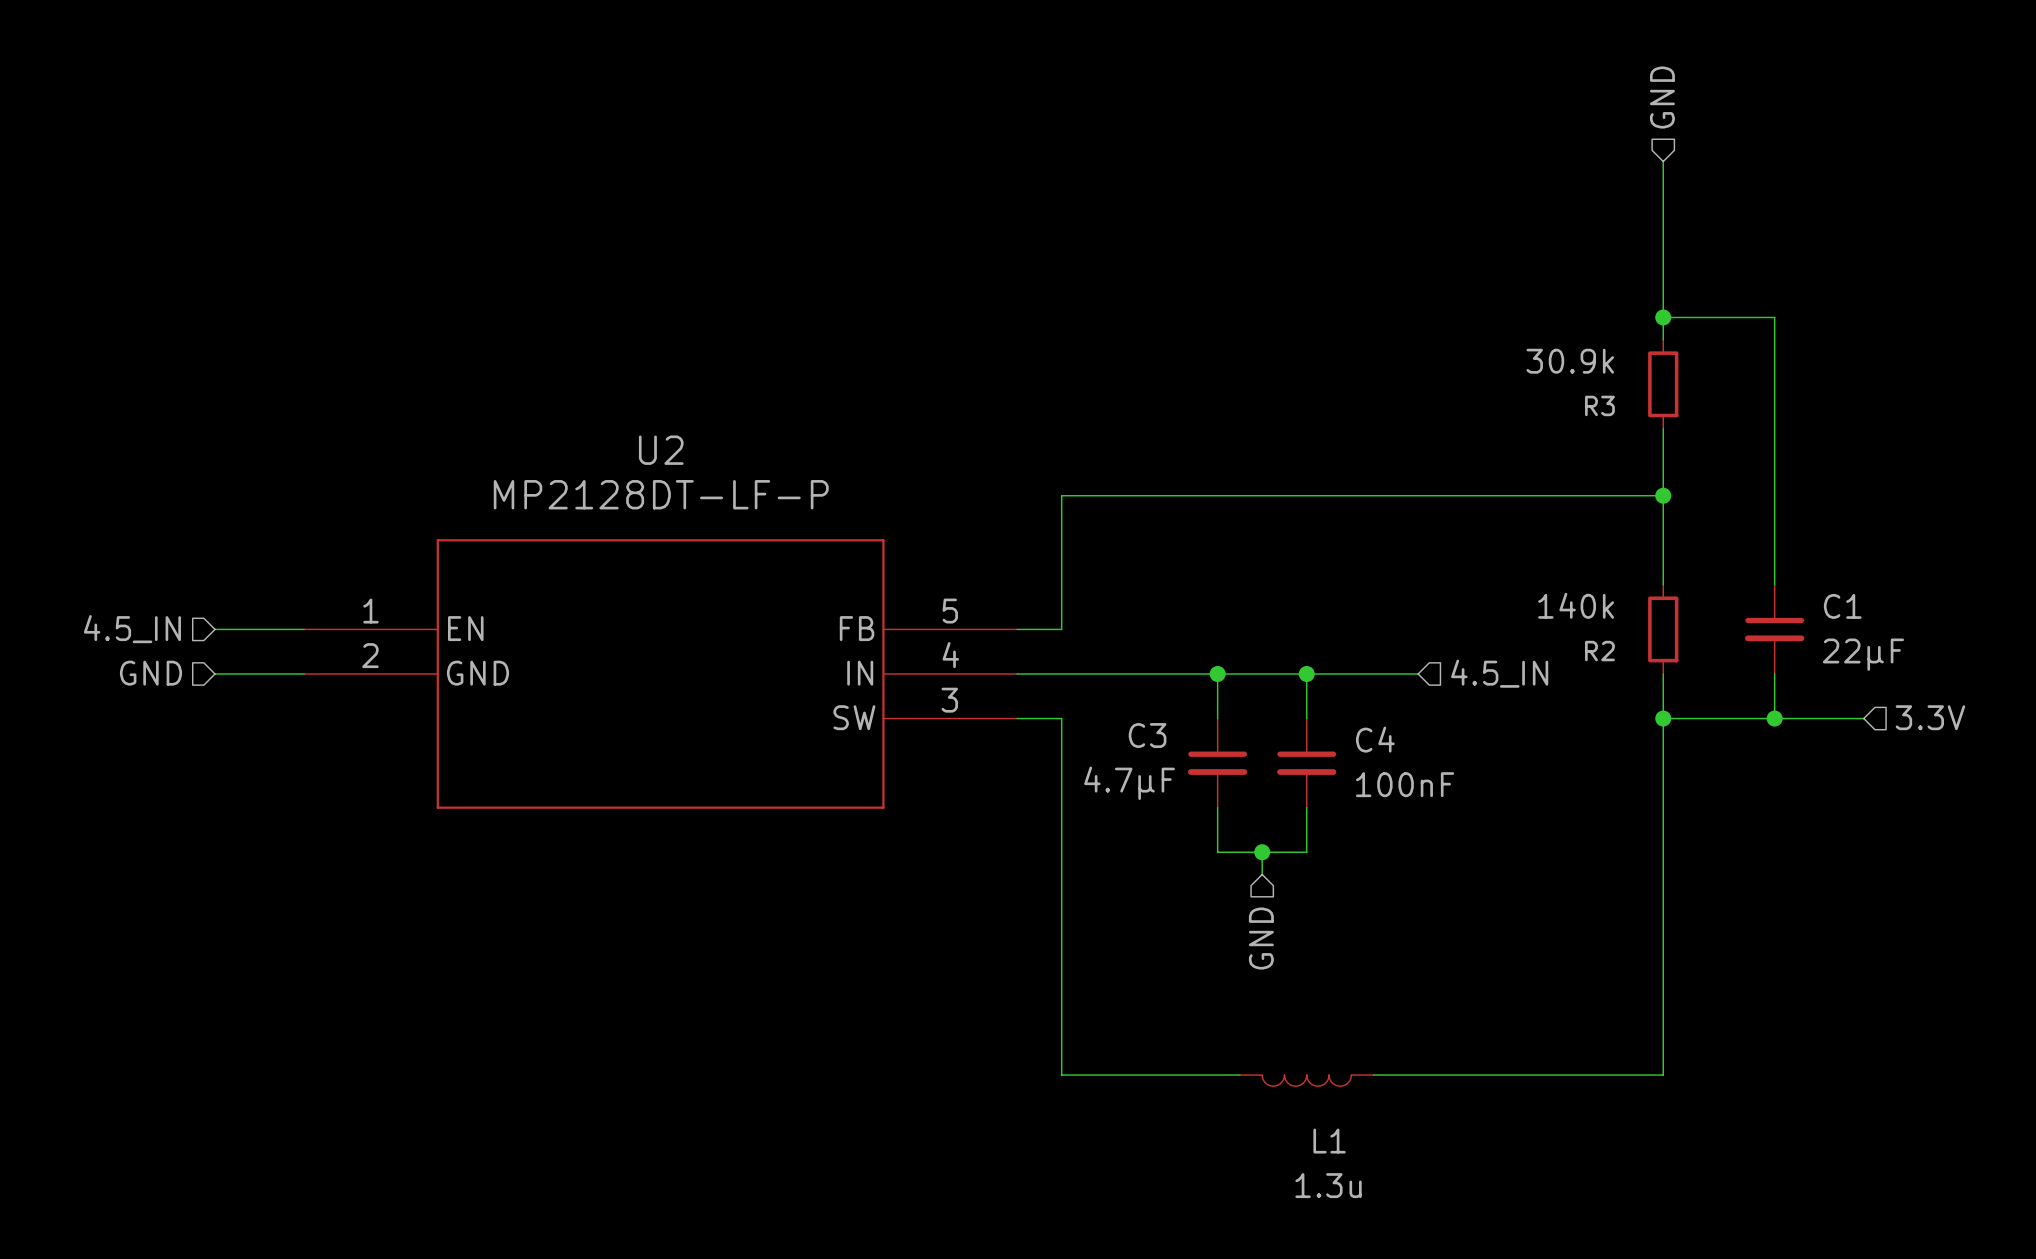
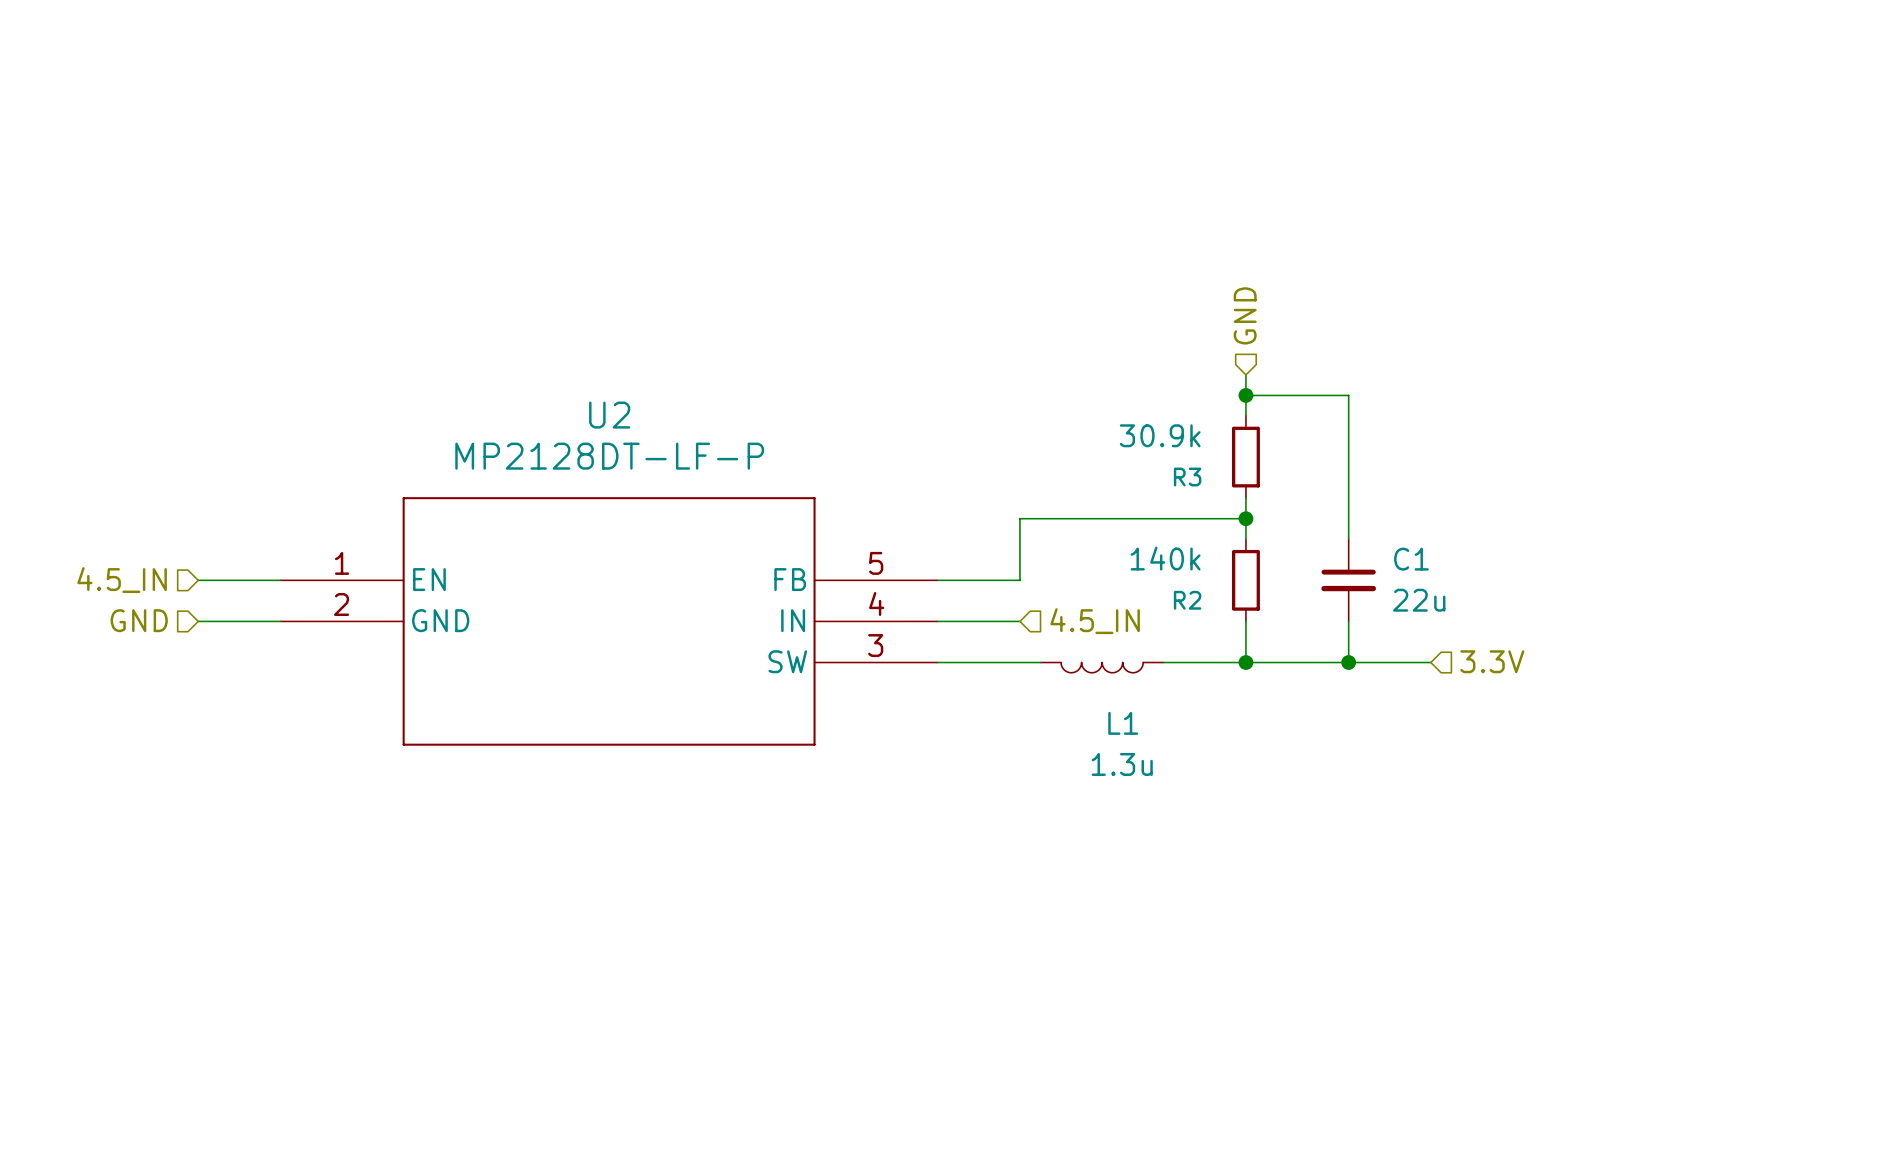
hierarchical label: GND (1662, 97) -> none
wire: (1663, 161) (1663, 339) -> none
wire: (1663, 317) (1774, 317) (1774, 584) -> none
junction: (1663, 317) -> none
hierarchical label: none -> GND (1245, 315)
R3 position: (1663, 384) -> (1245, 457)
wire: none -> (1245, 374) (1245, 415)
wire: none -> (1245, 395) (1348, 395) (1348, 539)
junction: none -> (1245, 395)
wire: (1663, 428) (1663, 584) -> none
wire: (1663, 495) (1061, 495) (1061, 629) -> (1245, 518) (1019, 518) (1019, 580) (978, 580)
junction: (1663, 495) -> none
junction: none -> (1245, 518)
R2 position: (1663, 629) -> (1245, 580)
C1 position: (1774, 629) -> (1348, 580)
C1 value: 22µF (1863, 654) -> 22u (1419, 600)
wire: (1106, 673) (1418, 673) -> none
wire: (1217, 673) (1217, 718) -> (1245, 498) (1245, 539)
junction: (1217, 673) -> none
wire: (1306, 673) (1306, 718) -> (1245, 621) (1245, 662)
junction: (1306, 673) -> none
hierarchical label position: 4.5_IN (1499, 673) -> 4.5_IN (1095, 621)
wire: (1663, 673) (1663, 1075) (1373, 1075) -> none
wire: (1774, 673) (1774, 718) -> (1348, 621) (1348, 662)
hierarchical label position: 3.3V (1930, 717) -> 3.3V (1492, 661)
wire: (1061, 718) (1061, 1075) (1239, 1075) -> (978, 662) (1040, 662)
wire: none -> (1163, 662) (1430, 662)
junction: none -> (1245, 662)
junction: none -> (1348, 662)
wire: (1663, 718) (1863, 718) -> none
junction: (1663, 718) -> none
junction: (1774, 718) -> none
C3: 4.7µF (1217, 763) -> none
C4: 100nF (1306, 763) -> none
wire: (1217, 807) (1217, 852) (1306, 852) (1306, 807) -> none
wire: (1262, 852) (1262, 874) -> none
junction: (1262, 852) -> none
hierarchical label: GND (1261, 938) -> none
L1 position: (1306, 1080) -> (1102, 667)

